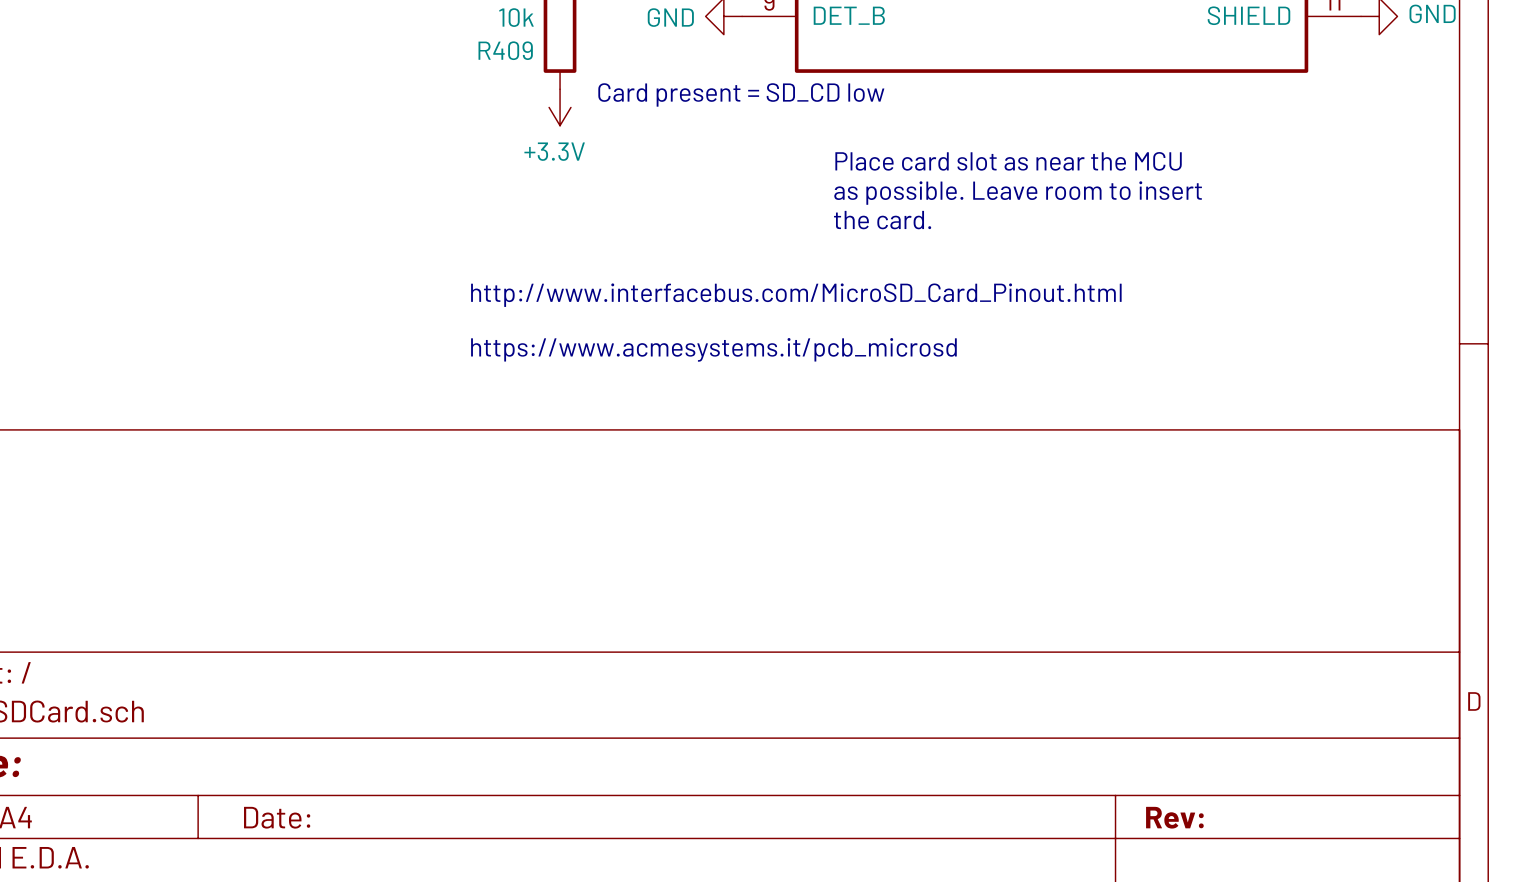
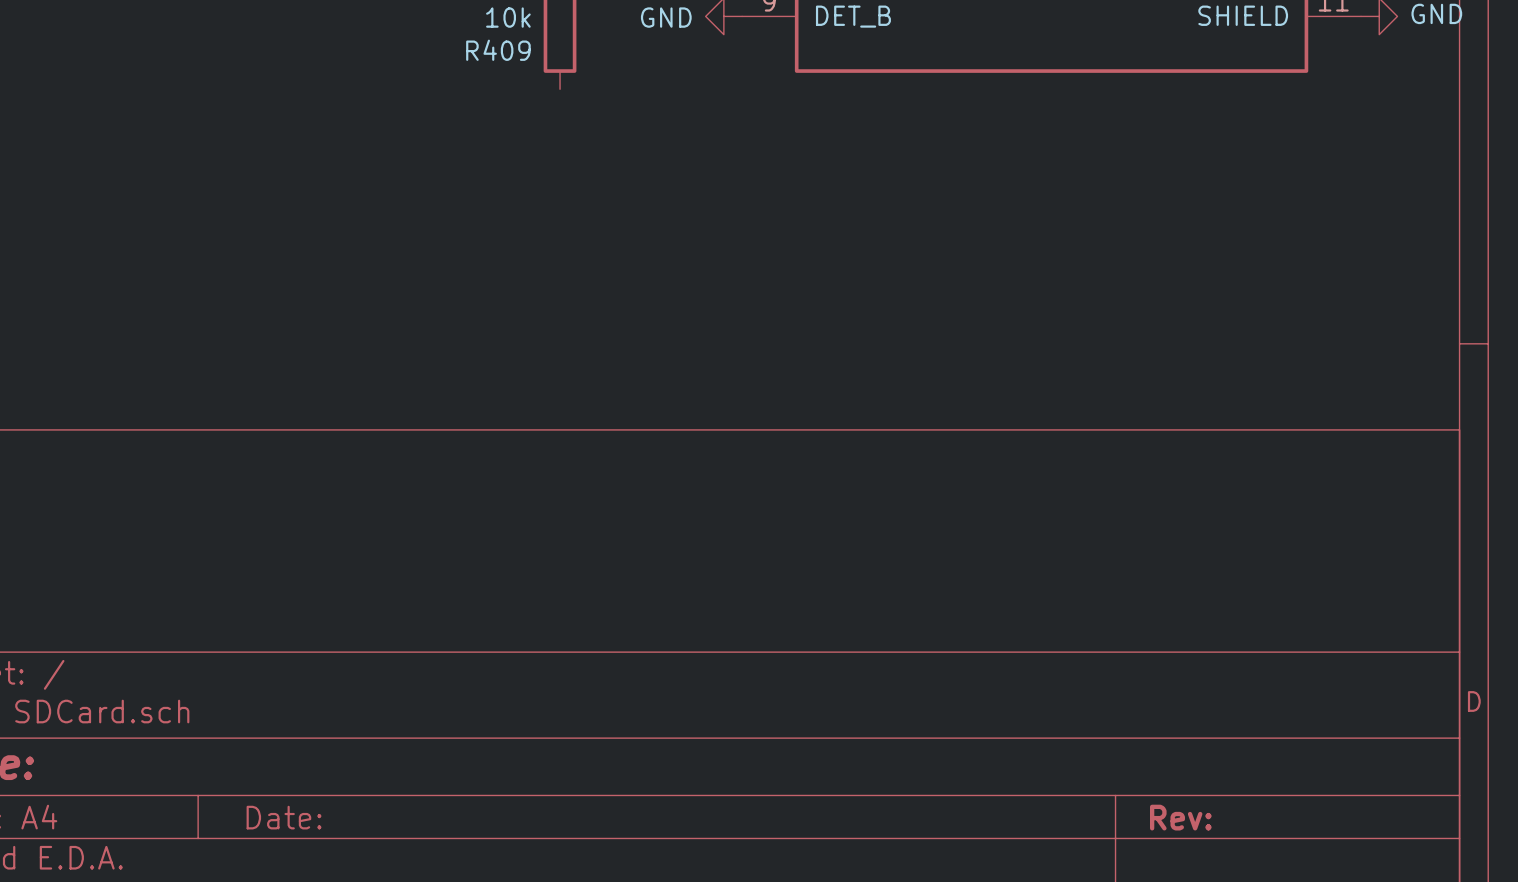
text: Card present = SD_CD low (741, 94) -> none
power symbol: +3.3V (560, 107) -> none
text: Place card slot as near the MCU (1008, 161) -> none
text: as possible. Leave room to insert (1018, 193) -> none
text: the card. (882, 220) -> none
text: http://www.interfacebus.com/MicroSD_Card_Pinout.html (796, 295) -> none
text: https://www.acmesystems.it/pcb_microsd (713, 349) -> none

